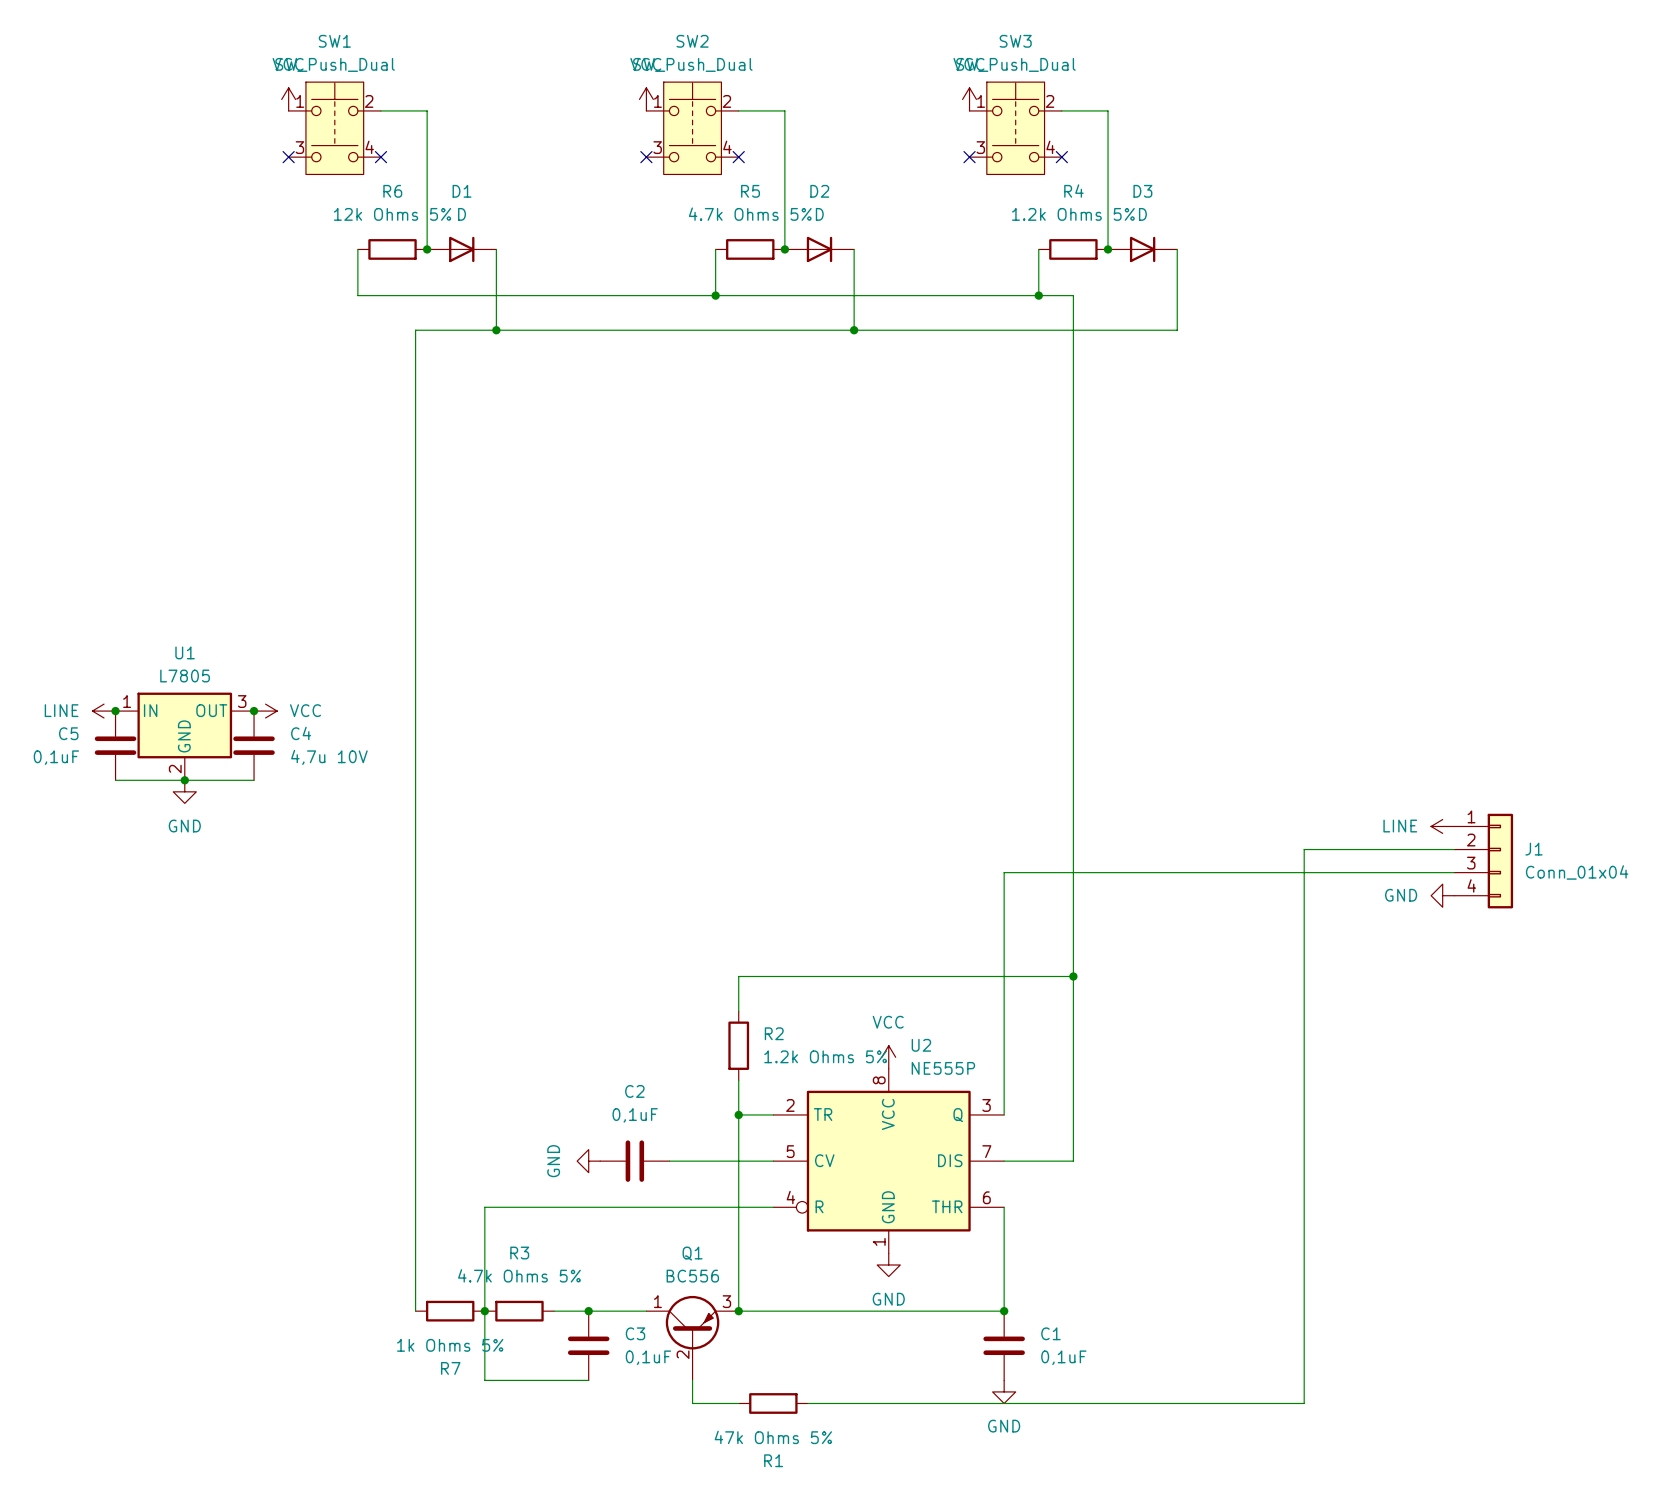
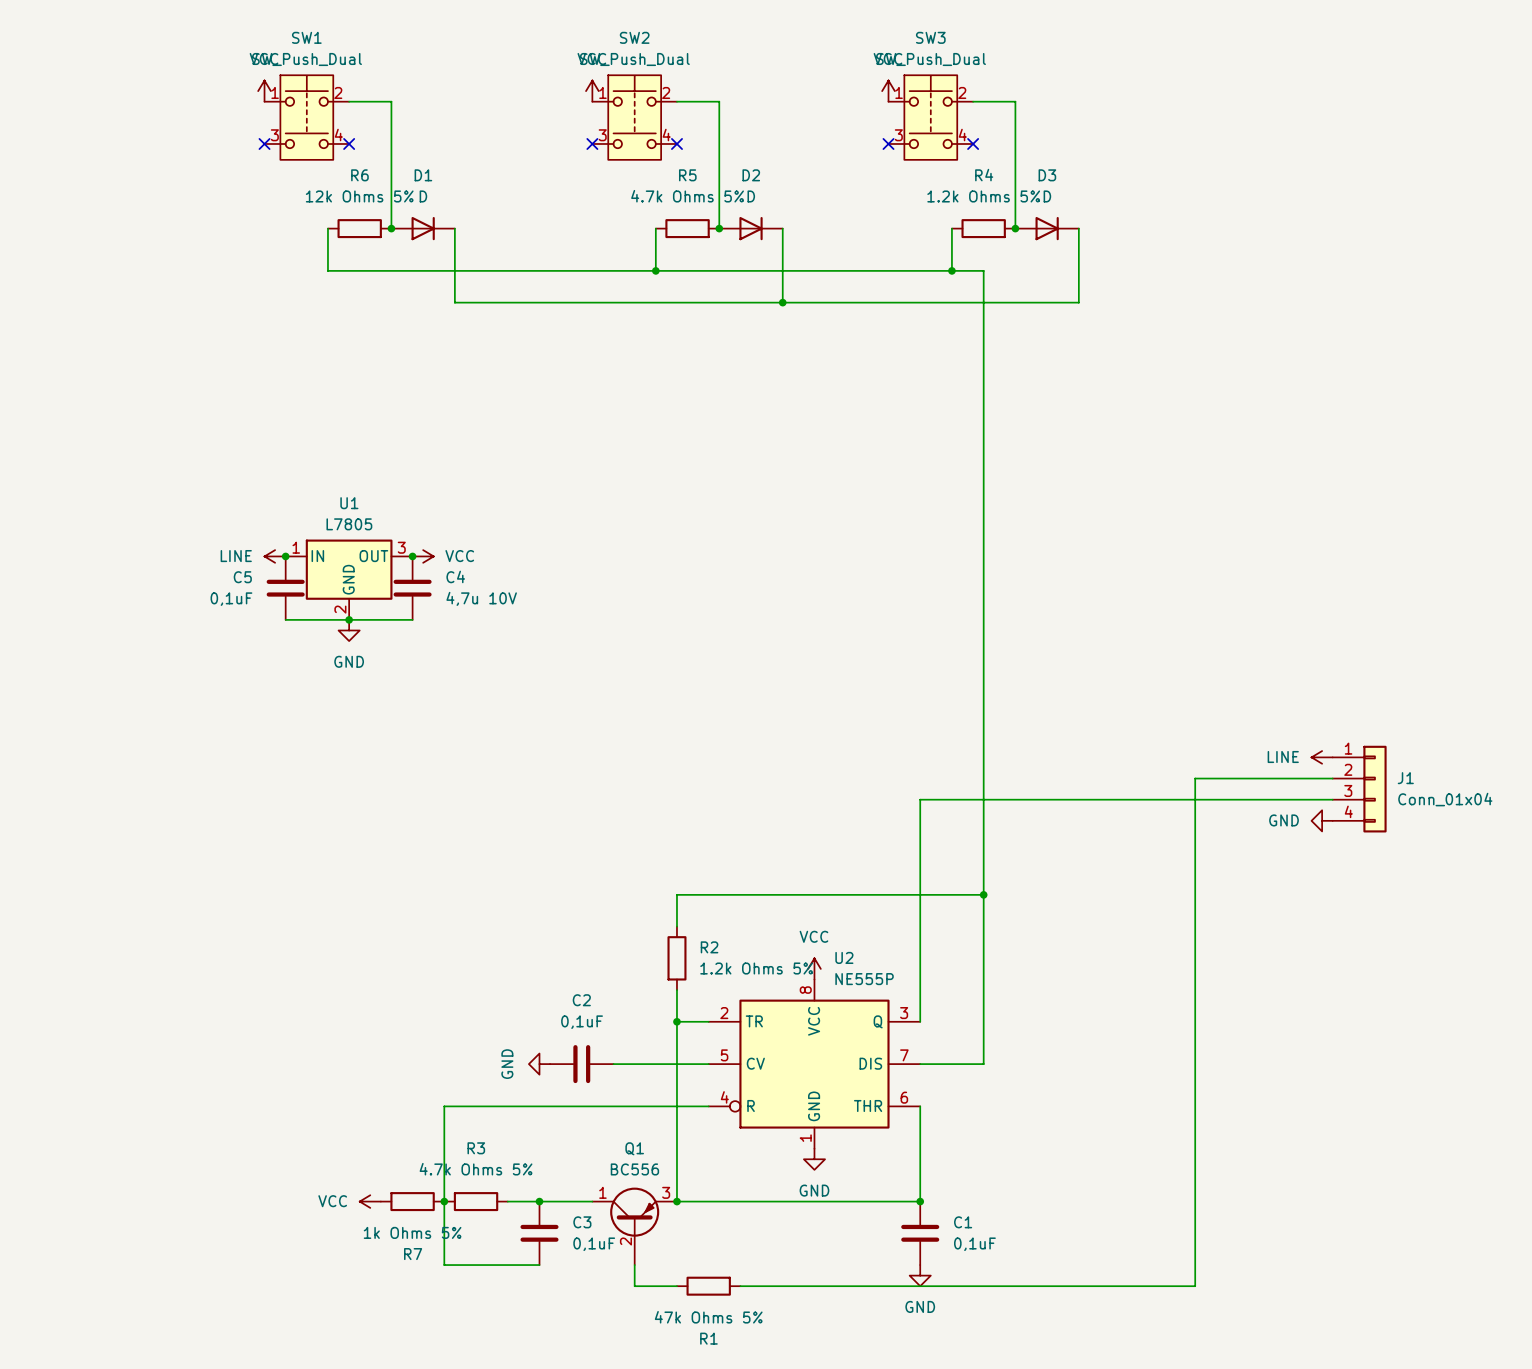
wire: (496, 330) (415, 330) (415, 1311) -> none
junction: (496, 330) -> none
junction: none -> (285, 556)
junction: none -> (412, 556)
junction: none -> (349, 619)
power symbol position: LINE (104, 711) -> LINE (275, 556)
junction: (115, 711) -> none
junction: (254, 711) -> none
power symbol position: VCC (265, 711) -> VCC (423, 556)
U1 position: (184, 736) -> (349, 579)
C5 position: (115, 745) -> (285, 588)
C4 position: (254, 745) -> (412, 588)
wire: (115, 780) (254, 780) -> (285, 619) (412, 619)
junction: (184, 780) -> none
power symbol position: GND (184, 791) -> GND (349, 630)
power symbol: none -> VCC (370, 1201)

